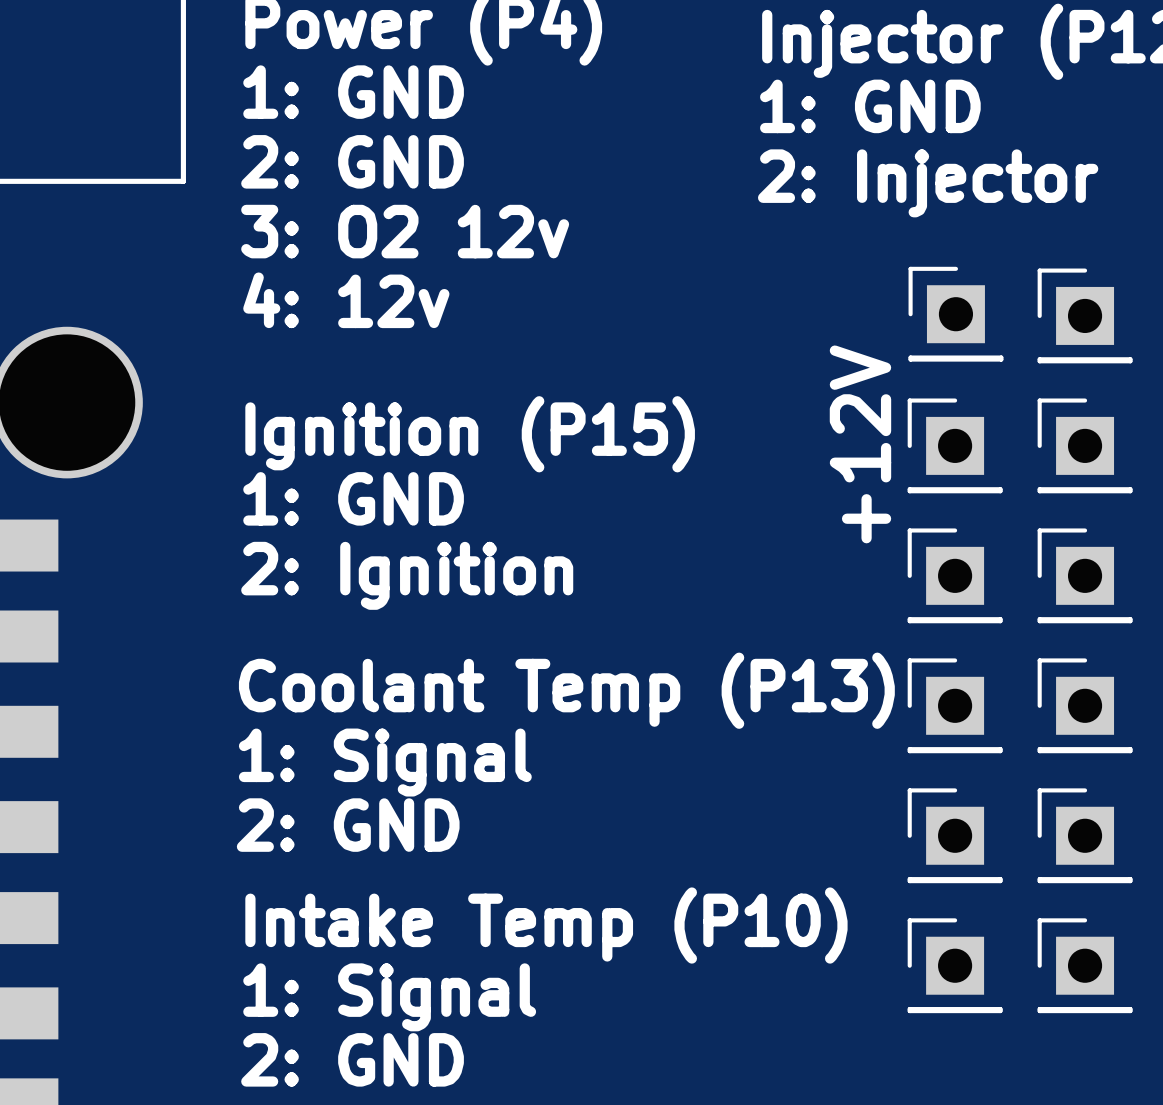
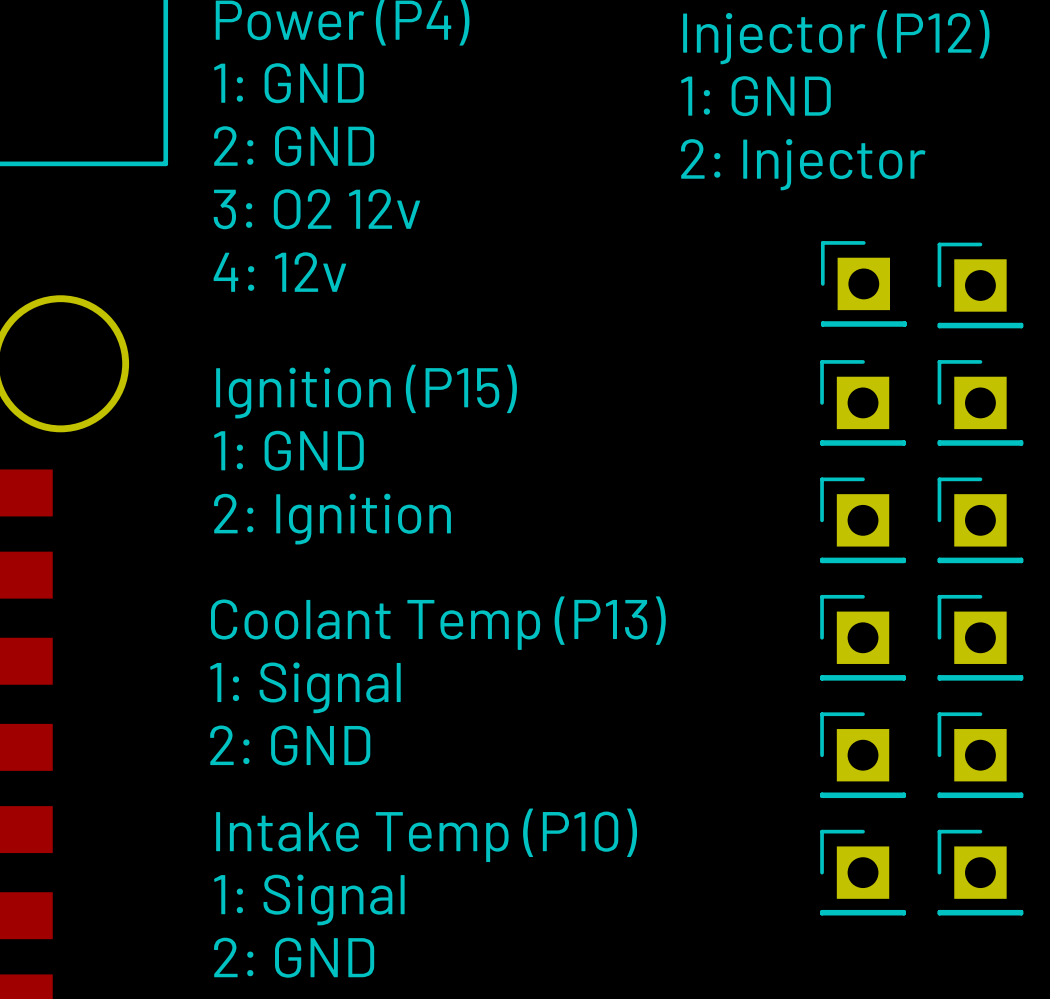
text: +12V (860, 444) -> none

